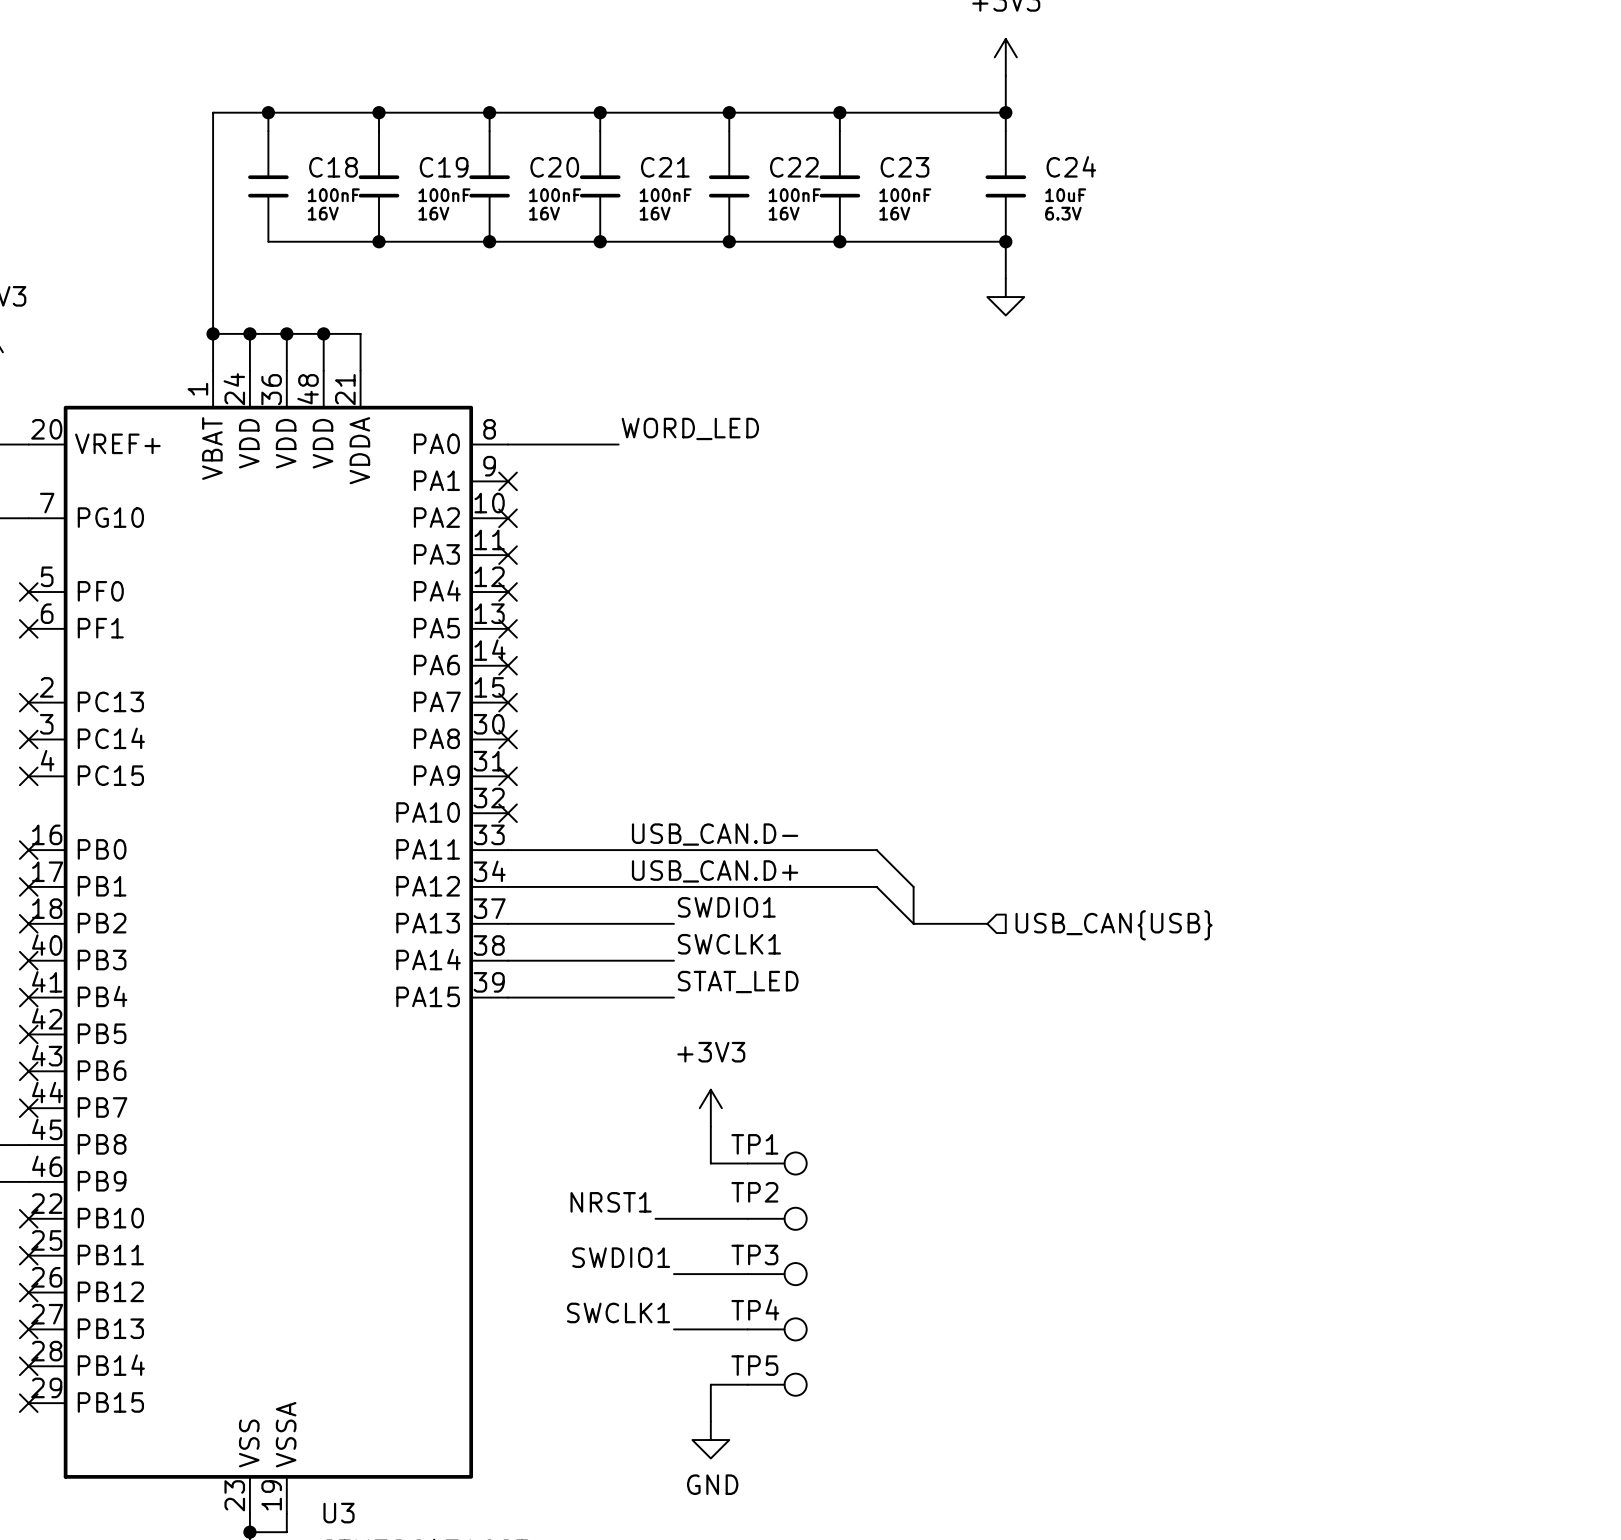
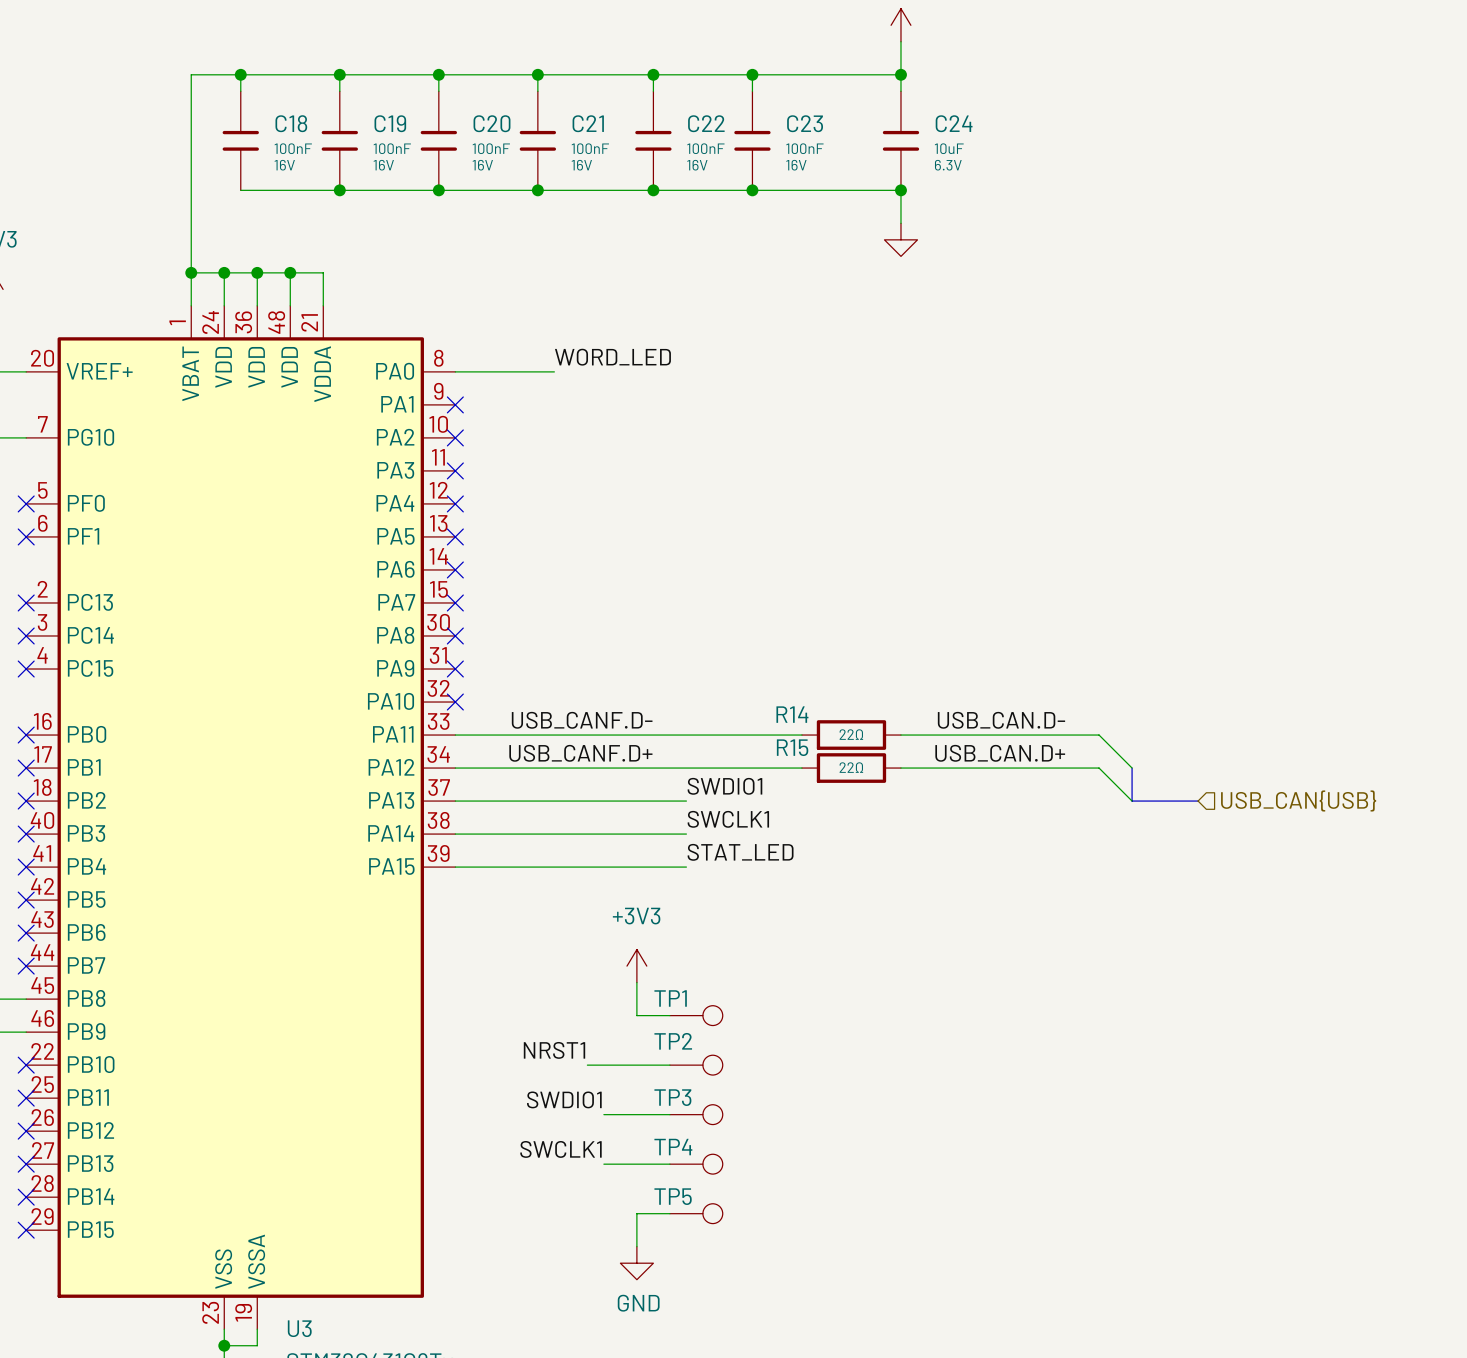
label: none -> USB_CANF.D- (582, 720)
label: USB_CAN.D- (715, 834) -> none
label: none -> USB_CAN.D- (1001, 720)
wire: (876, 850) (913, 886) -> (785, 735) (801, 735)
R14: none -> 22Ω (851, 735)
wire: none -> (900, 735) (1099, 735) (1132, 768)
label: none -> USB_CANF.D+ (580, 753)
label: USB_CAN.D+ (715, 871) -> none
label: none -> USB_CAN.D+ (1000, 753)
wire: (876, 886) (913, 923) -> (785, 768) (801, 768)
bus: (913, 886) (913, 923) (987, 923) -> (1132, 768) (1132, 801) (1198, 801)
R15: none -> 22Ω (851, 768)
wire: none -> (900, 768) (1099, 768) (1132, 801)
label position: SWDIO1 (726, 907) -> SWDIO1 (724, 786)
wire: none -> (603, 801) (686, 801)
hierarchical label position: USB_CAN{USB} (1114, 925) -> USB_CAN{USB} (1298, 800)
label position: SWCLK1 (729, 944) -> SWCLK1 (728, 819)
wire: none -> (603, 834) (686, 834)
label position: STAT_LED (738, 982) -> STAT_LED (740, 852)
wire: none -> (603, 867) (686, 867)

